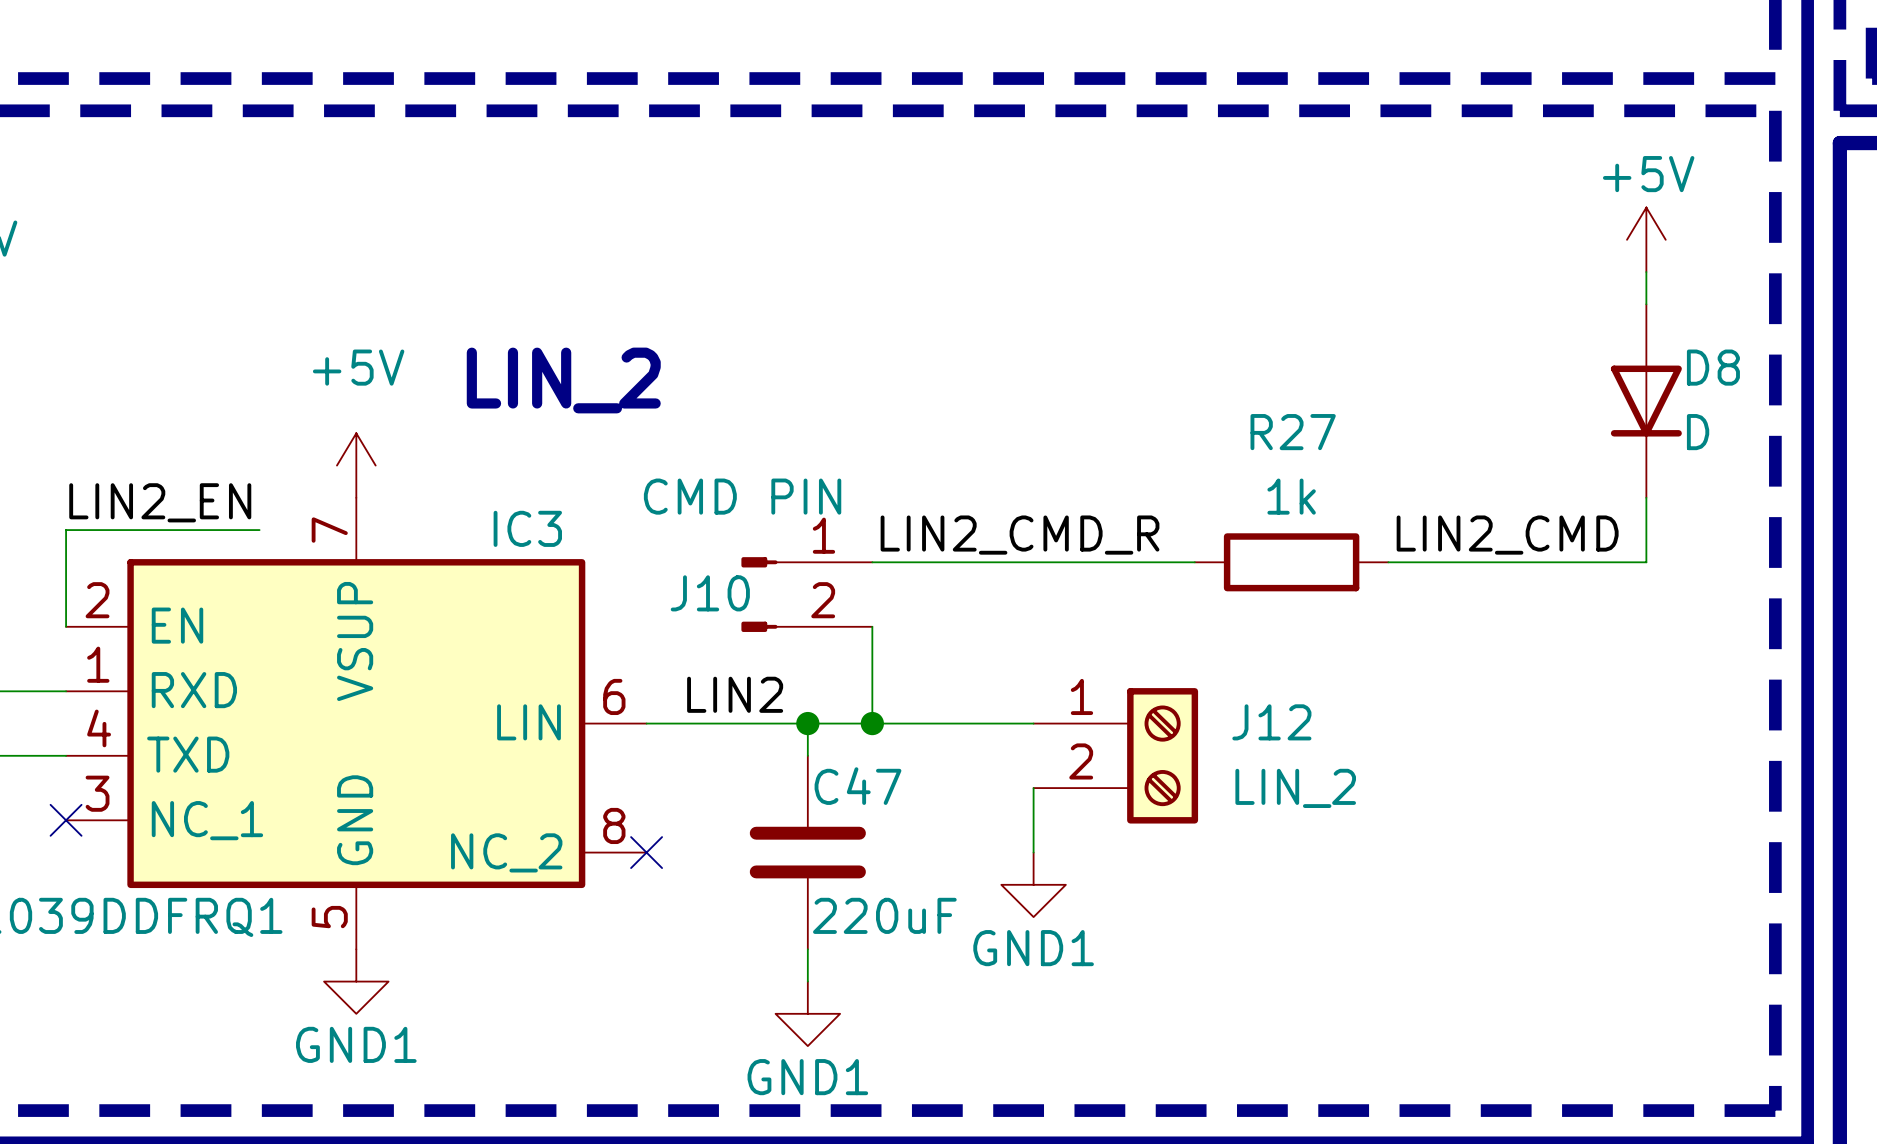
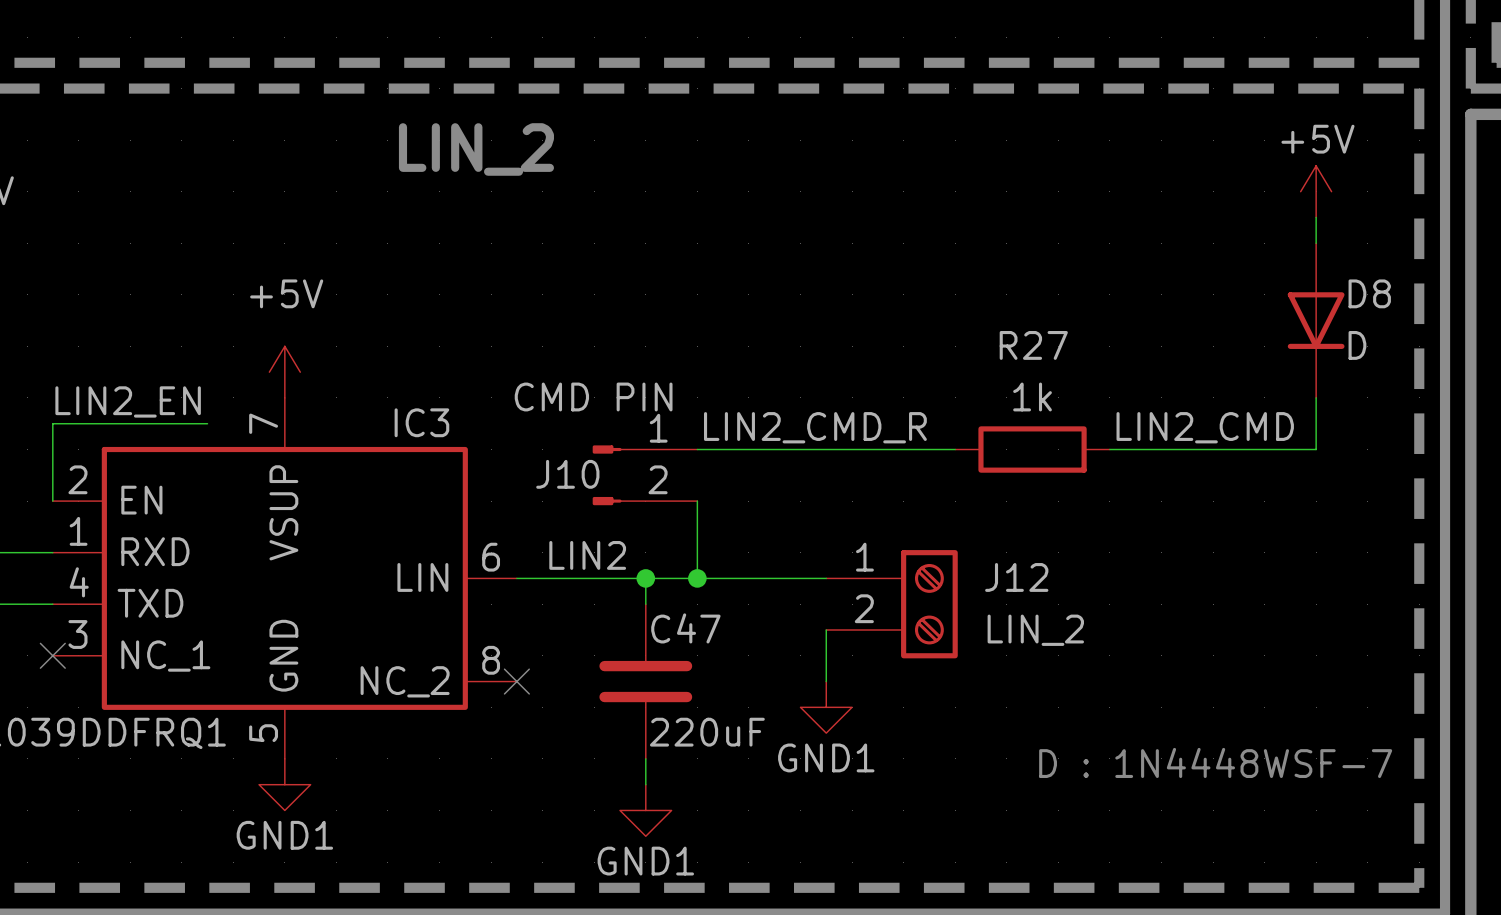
text position: LIN_2 (563, 380) -> LIN_2 (476, 149)
text: none -> D : 1N4448WSF-7 (1215, 762)

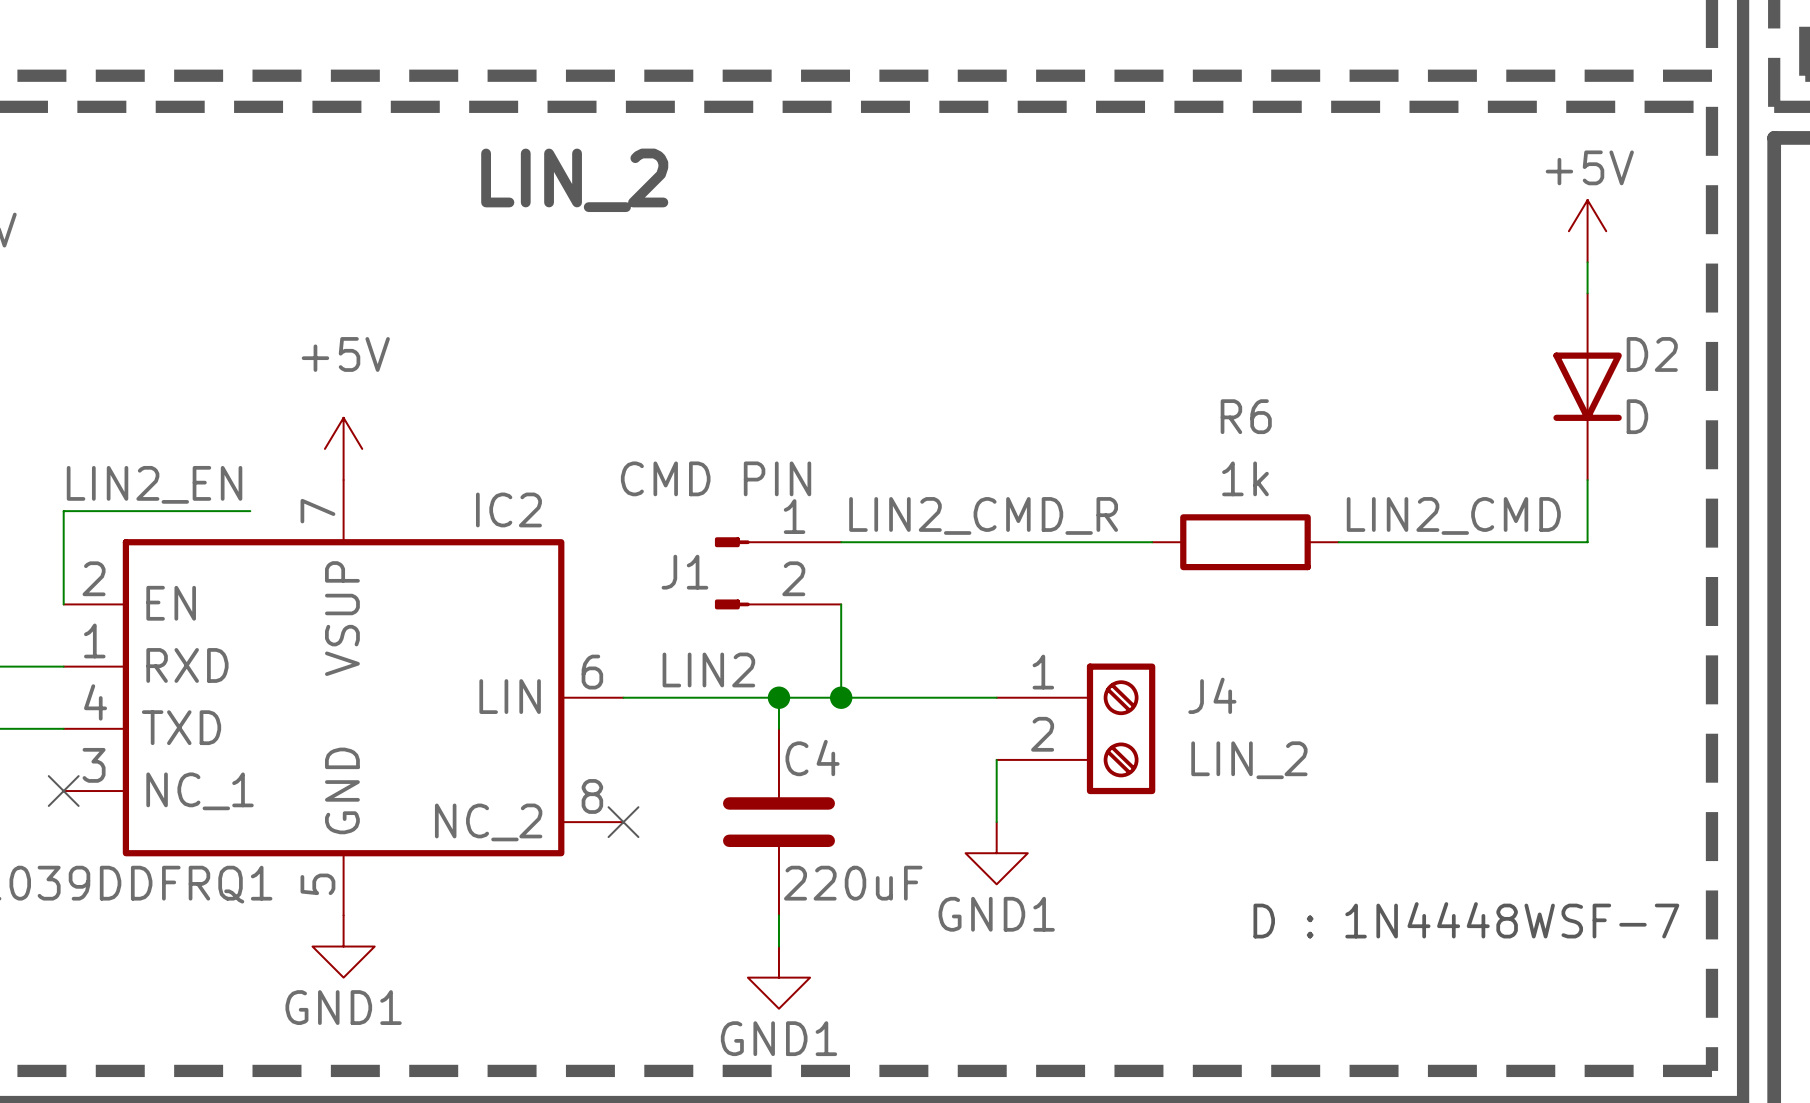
D8 name: D8 (1369, 293) -> D2 (1652, 354)
R27 name: R27 (1033, 345) -> R6 (1246, 416)
IC3 name: IC3 (421, 422) -> IC2 (508, 509)
J10 name: J10 (567, 474) -> J1 (684, 572)
J12 name: J12 (1016, 577) -> J4 (1212, 695)
C47 name: C47 (685, 628) -> C4 (812, 758)

